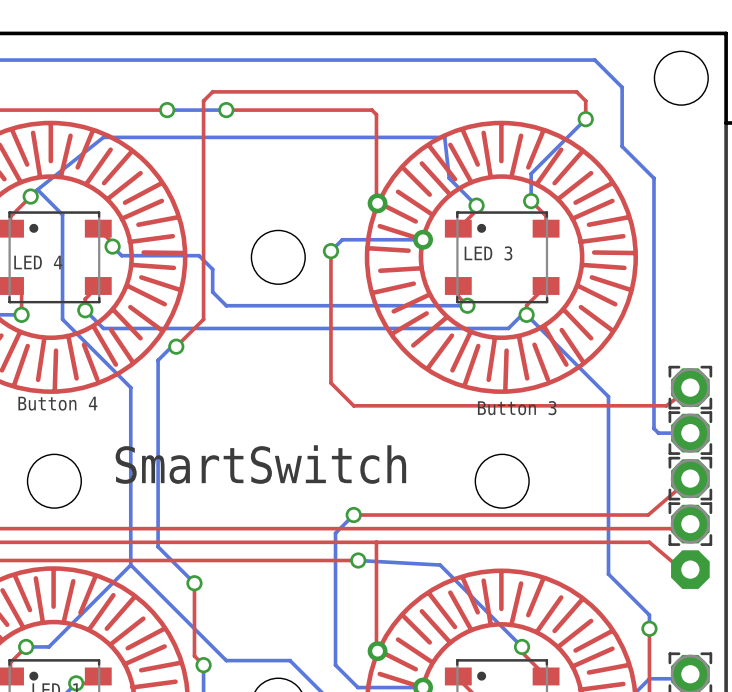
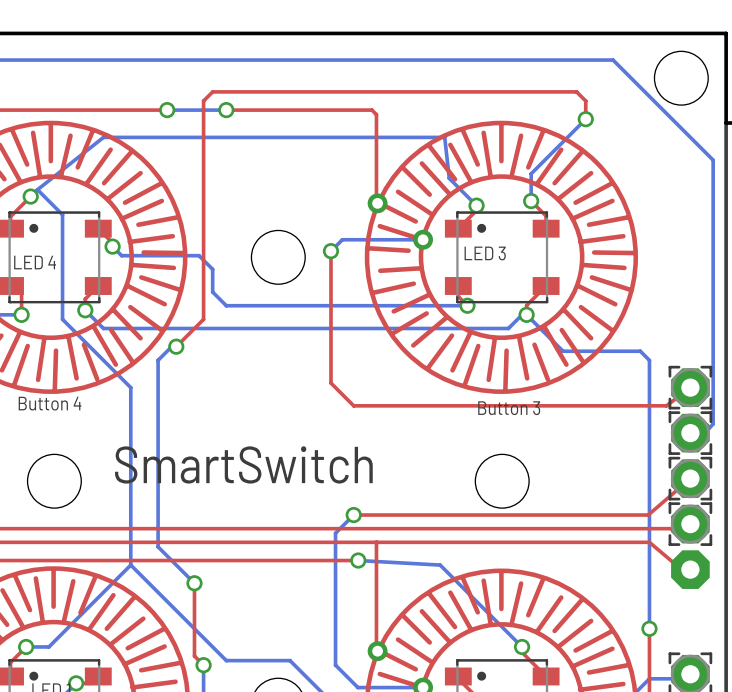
bottom track: (594, 60) (622, 87) (622, 146) (653, 178) (653, 428) (658, 433) (690, 433) -> (594, 60) (613, 60) (713, 160) (713, 424) (706, 431) (686, 431)
bottom track: (562, 351) (608, 396) (608, 574) (649, 615) -> (563, 351) (640, 351) (649, 360) (649, 615)

